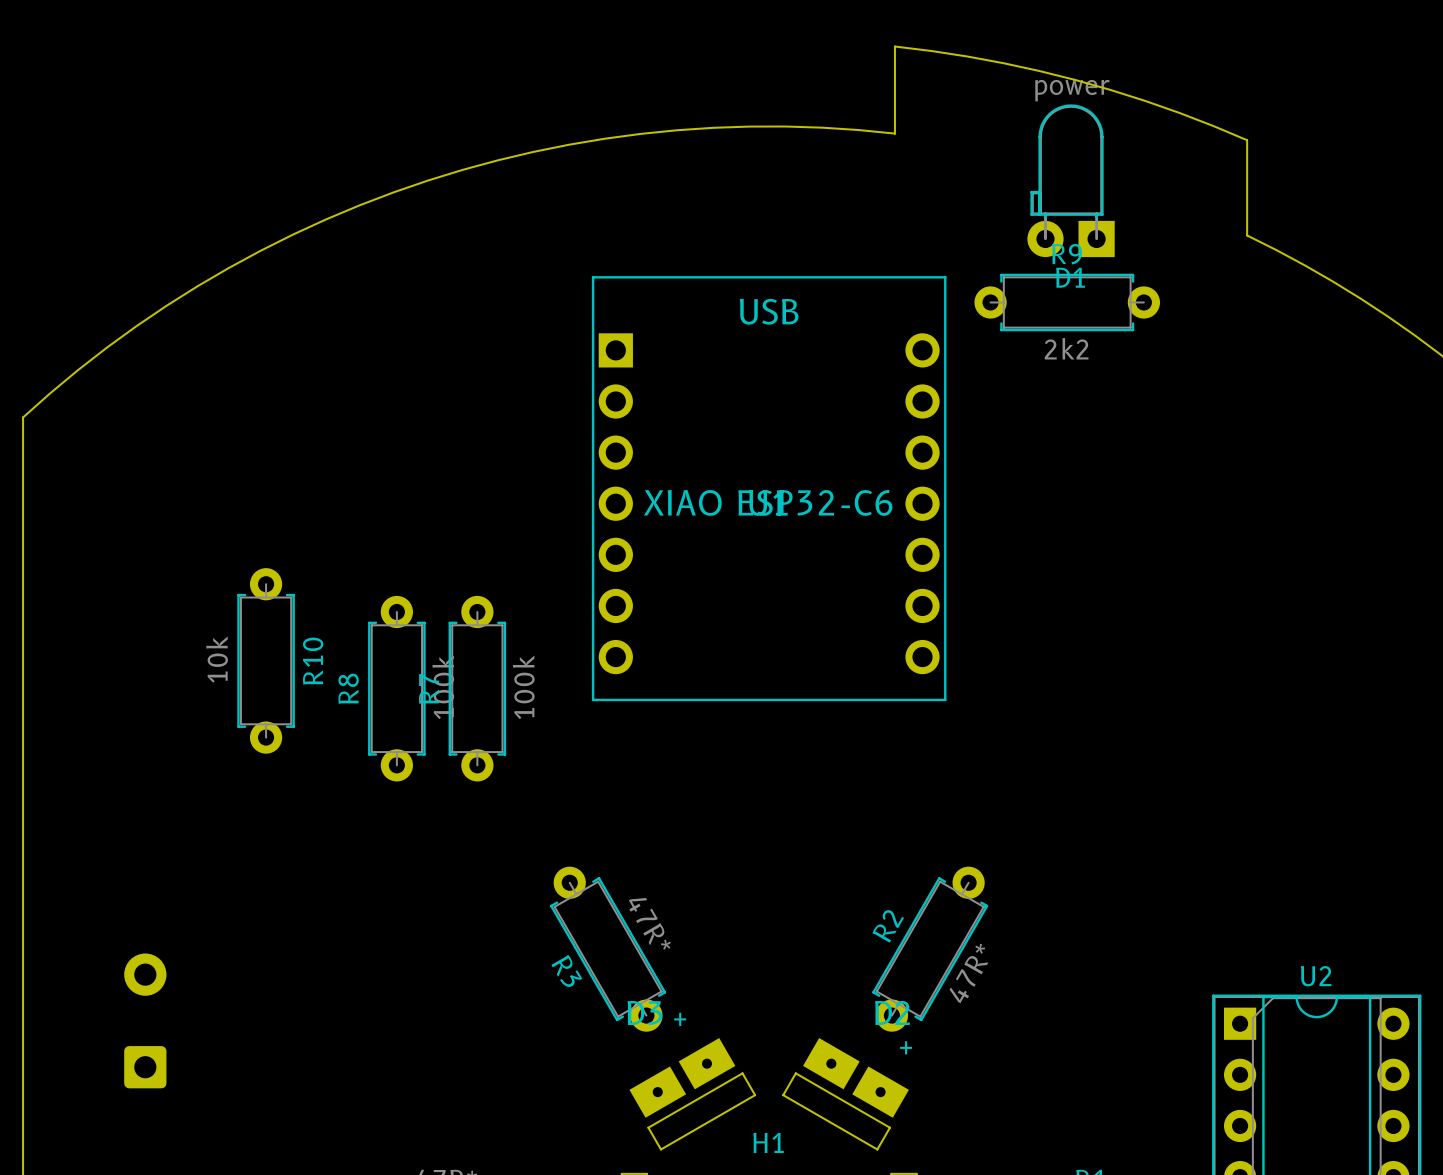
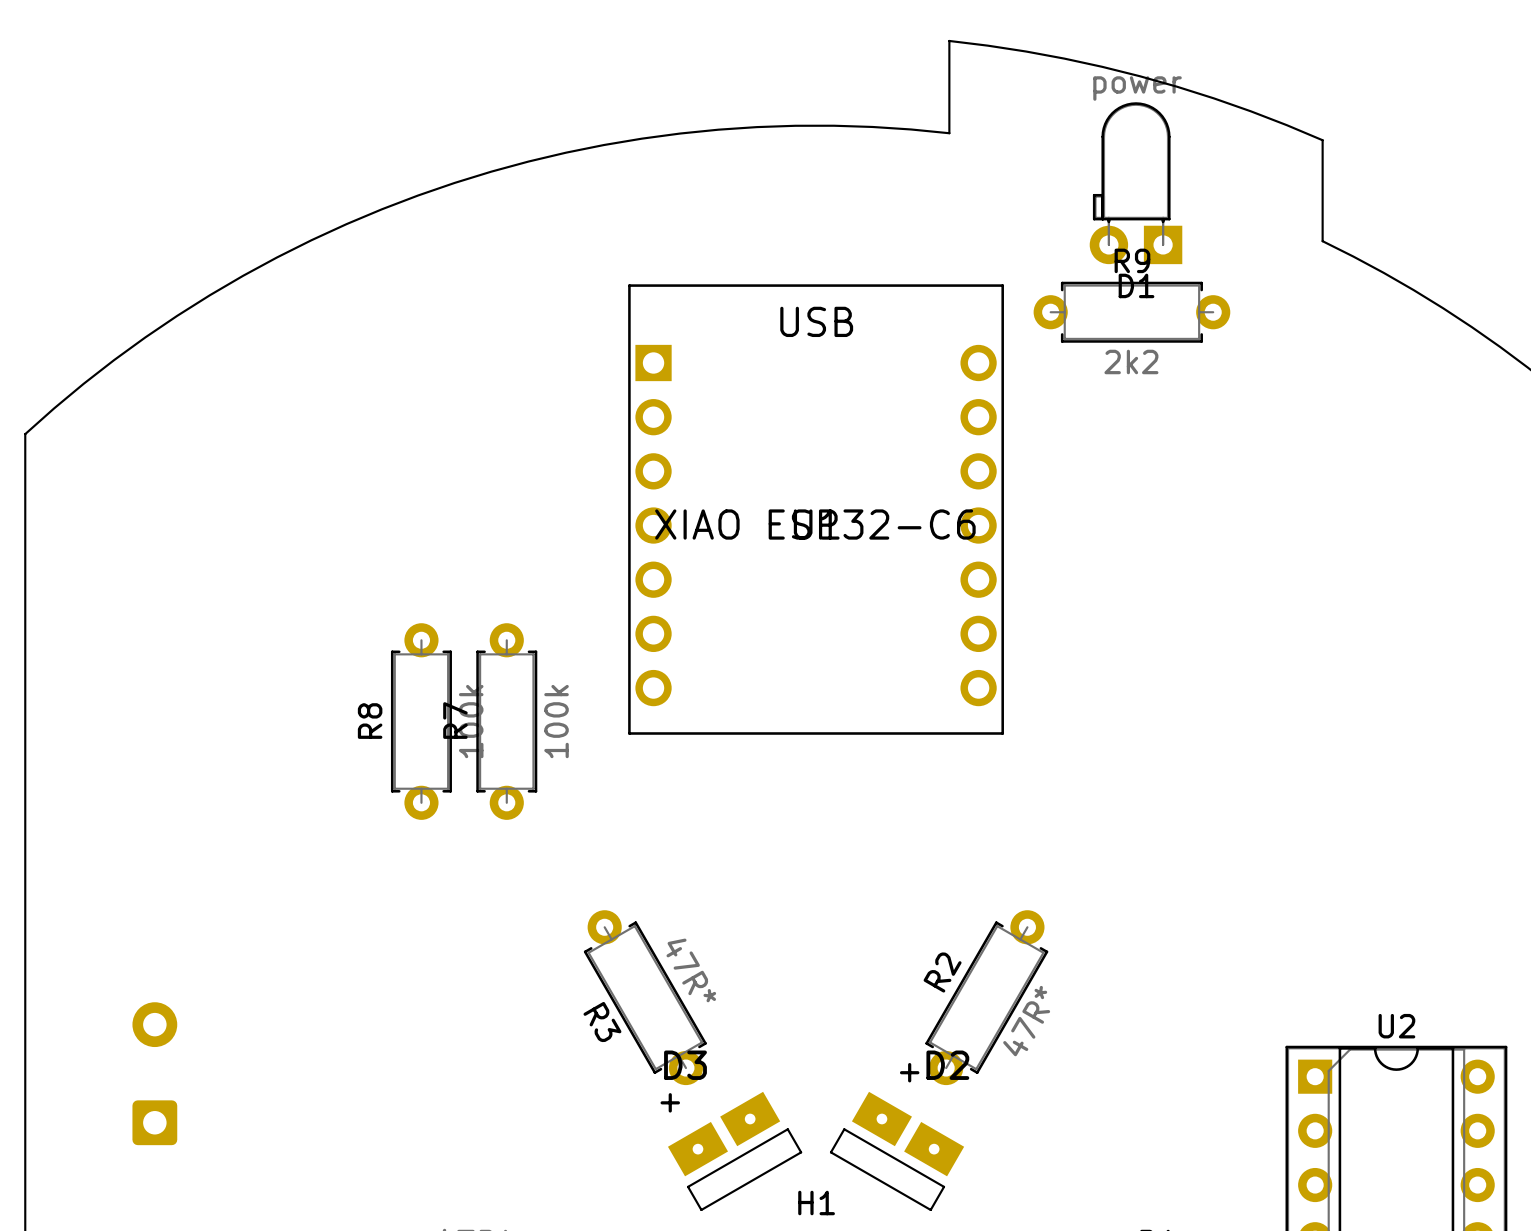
R10: 10k (266, 660) -> none
text position: + (680, 1019) -> + (670, 1102)
text position: + (906, 1047) -> + (909, 1072)

